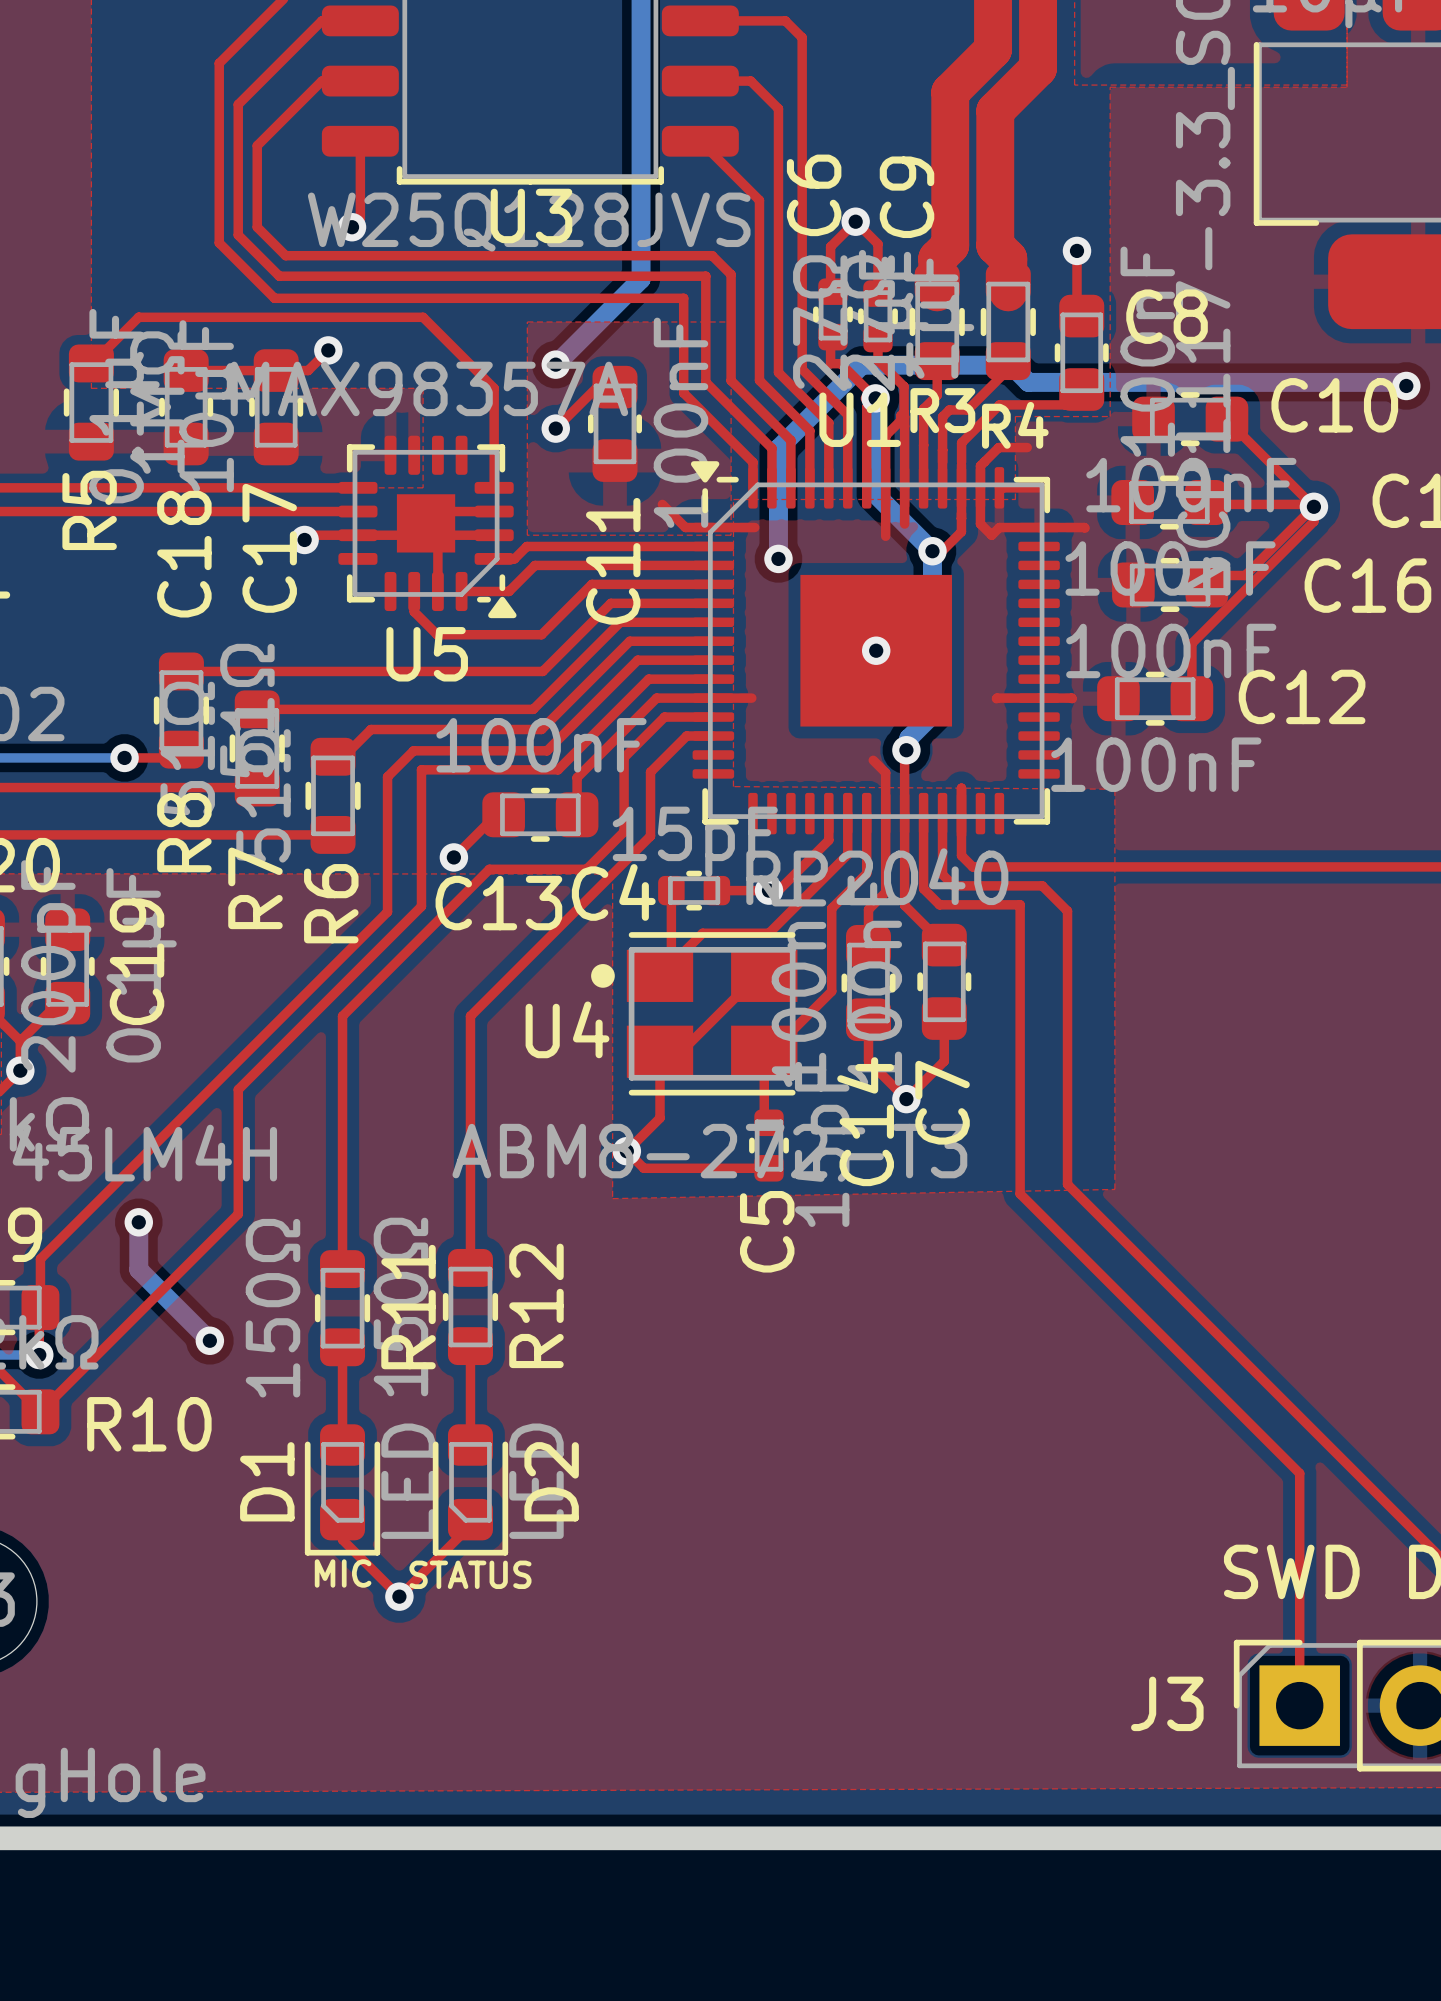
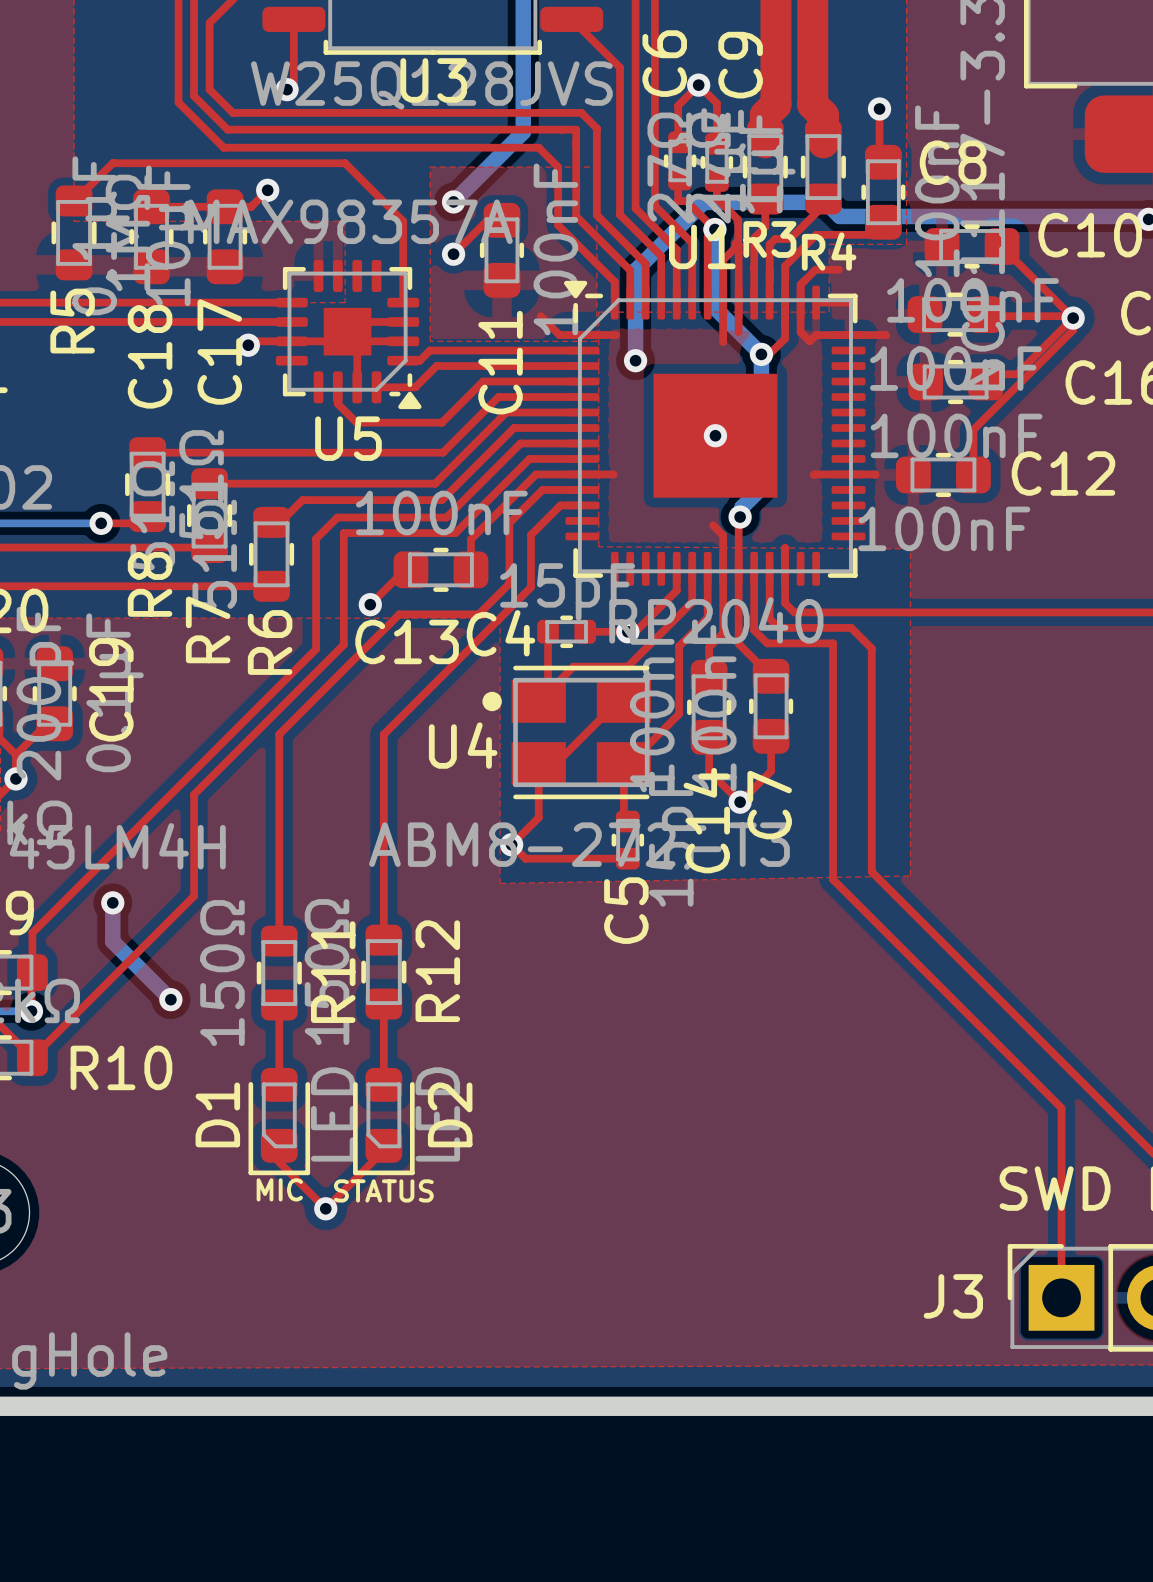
top track: (660, 298) (683, 298) (683, 321) -> (538, 147) (558, 167)

